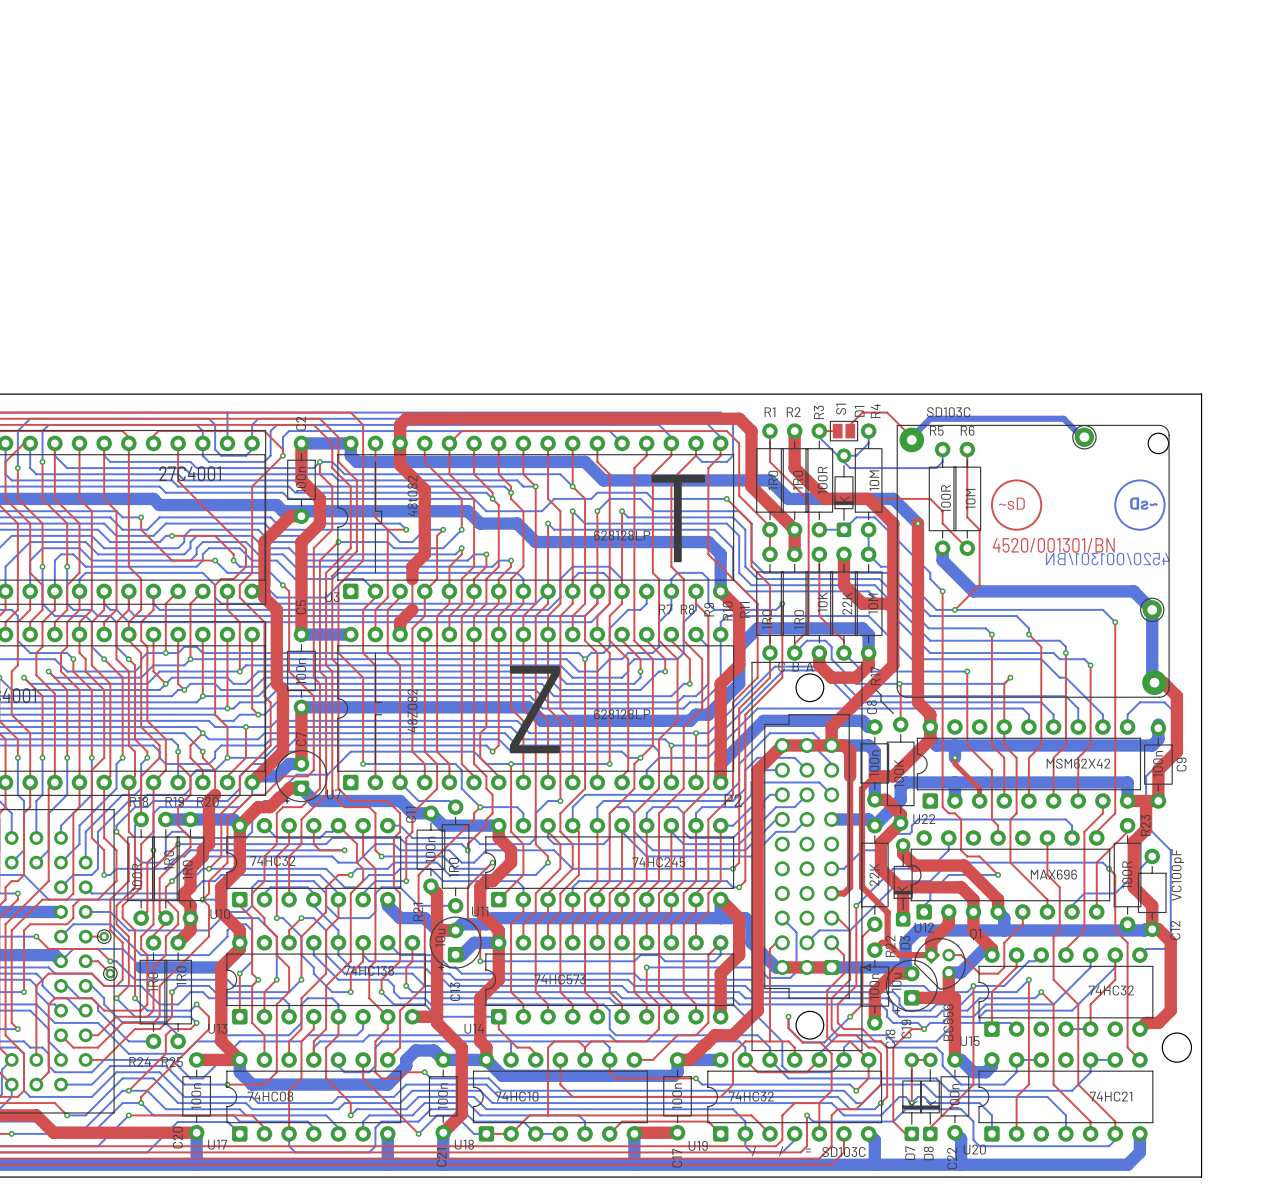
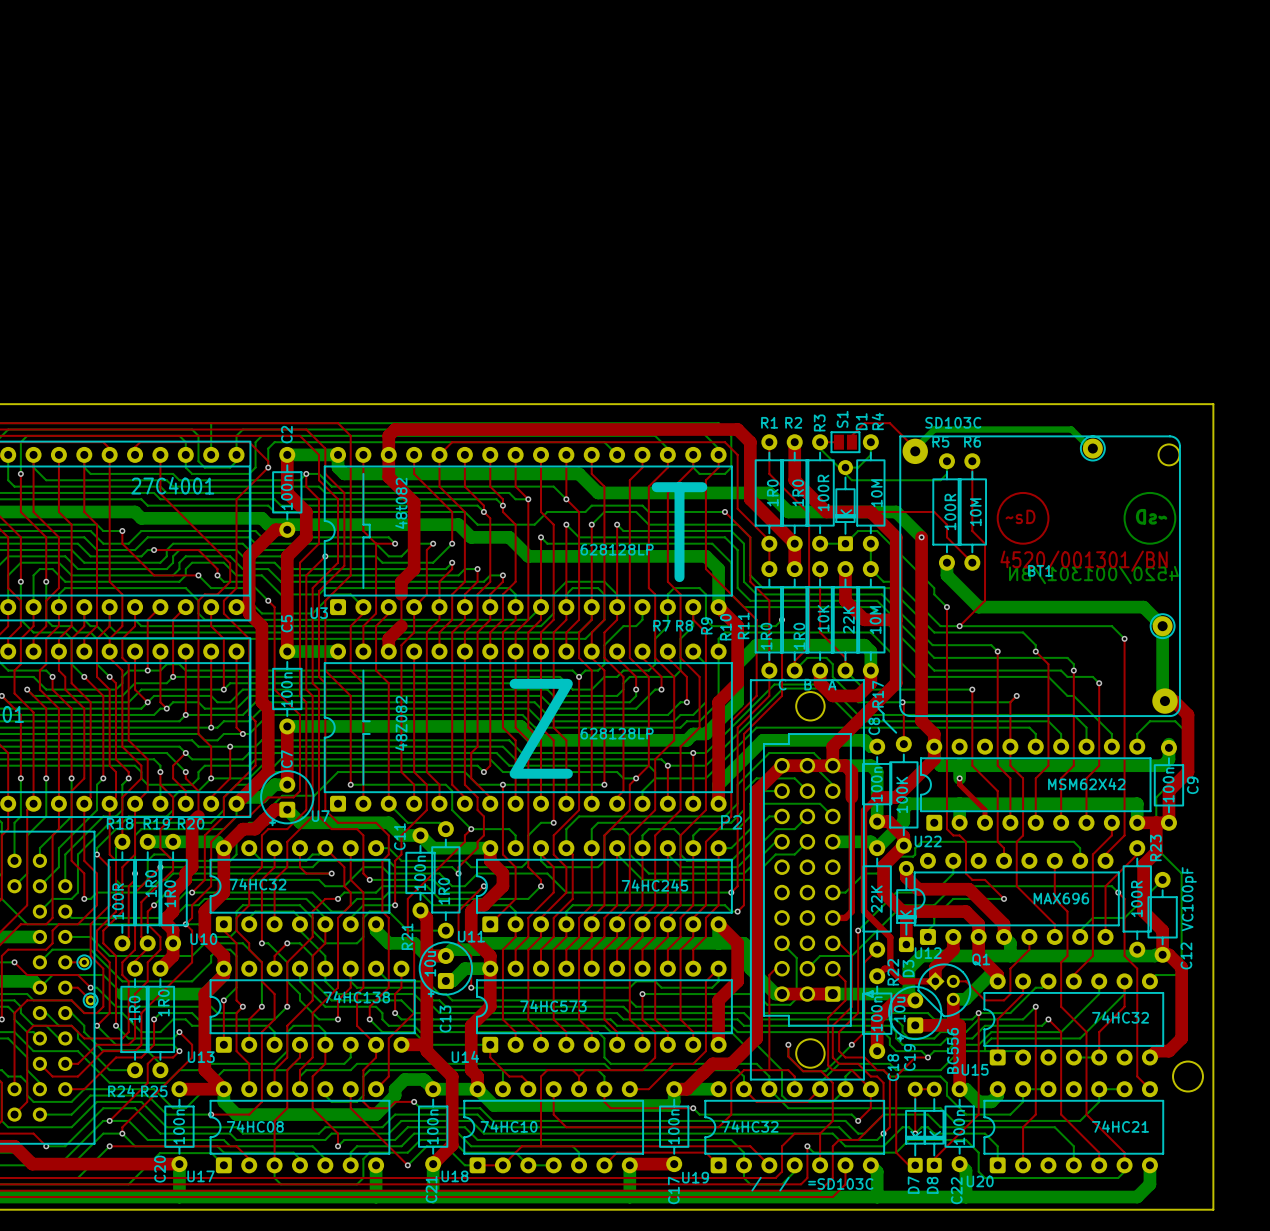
BT1 name: none -> BT1 (1040, 570)

